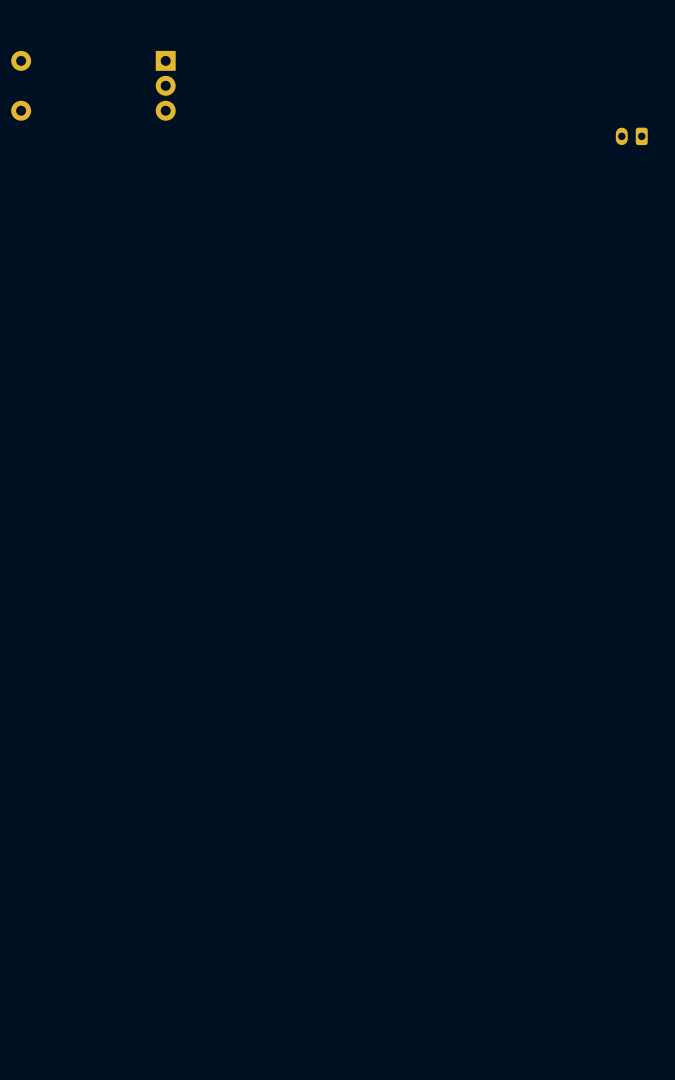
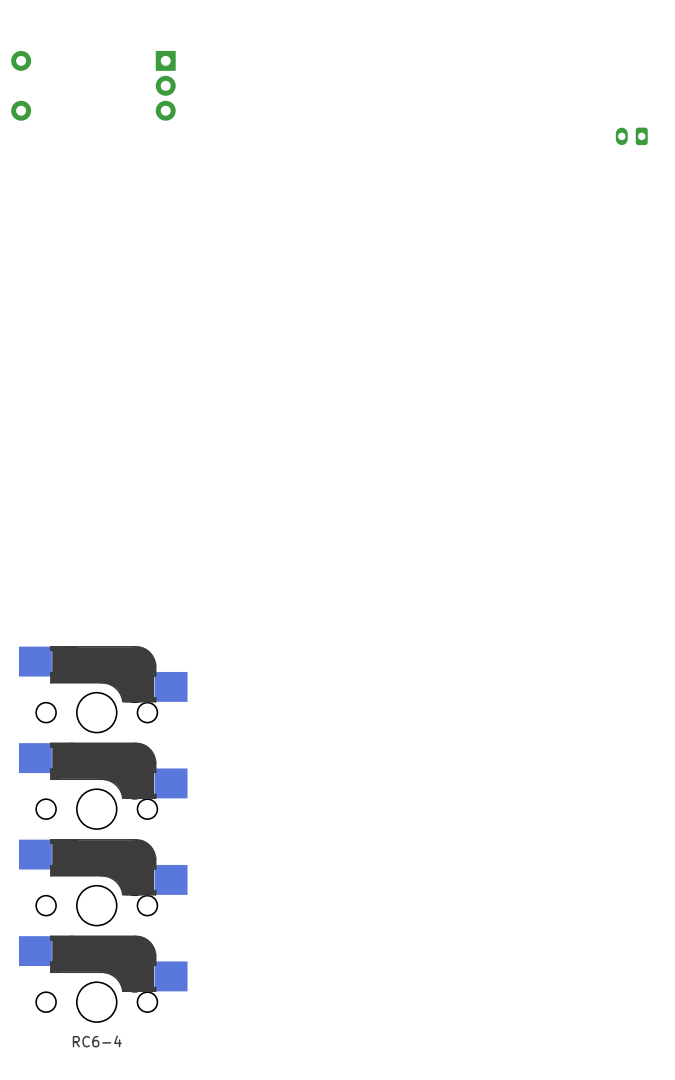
part: none -> (103, 689)
part: none -> (103, 785)
part: none -> (103, 882)
RC6-4: none -> (103, 978)

